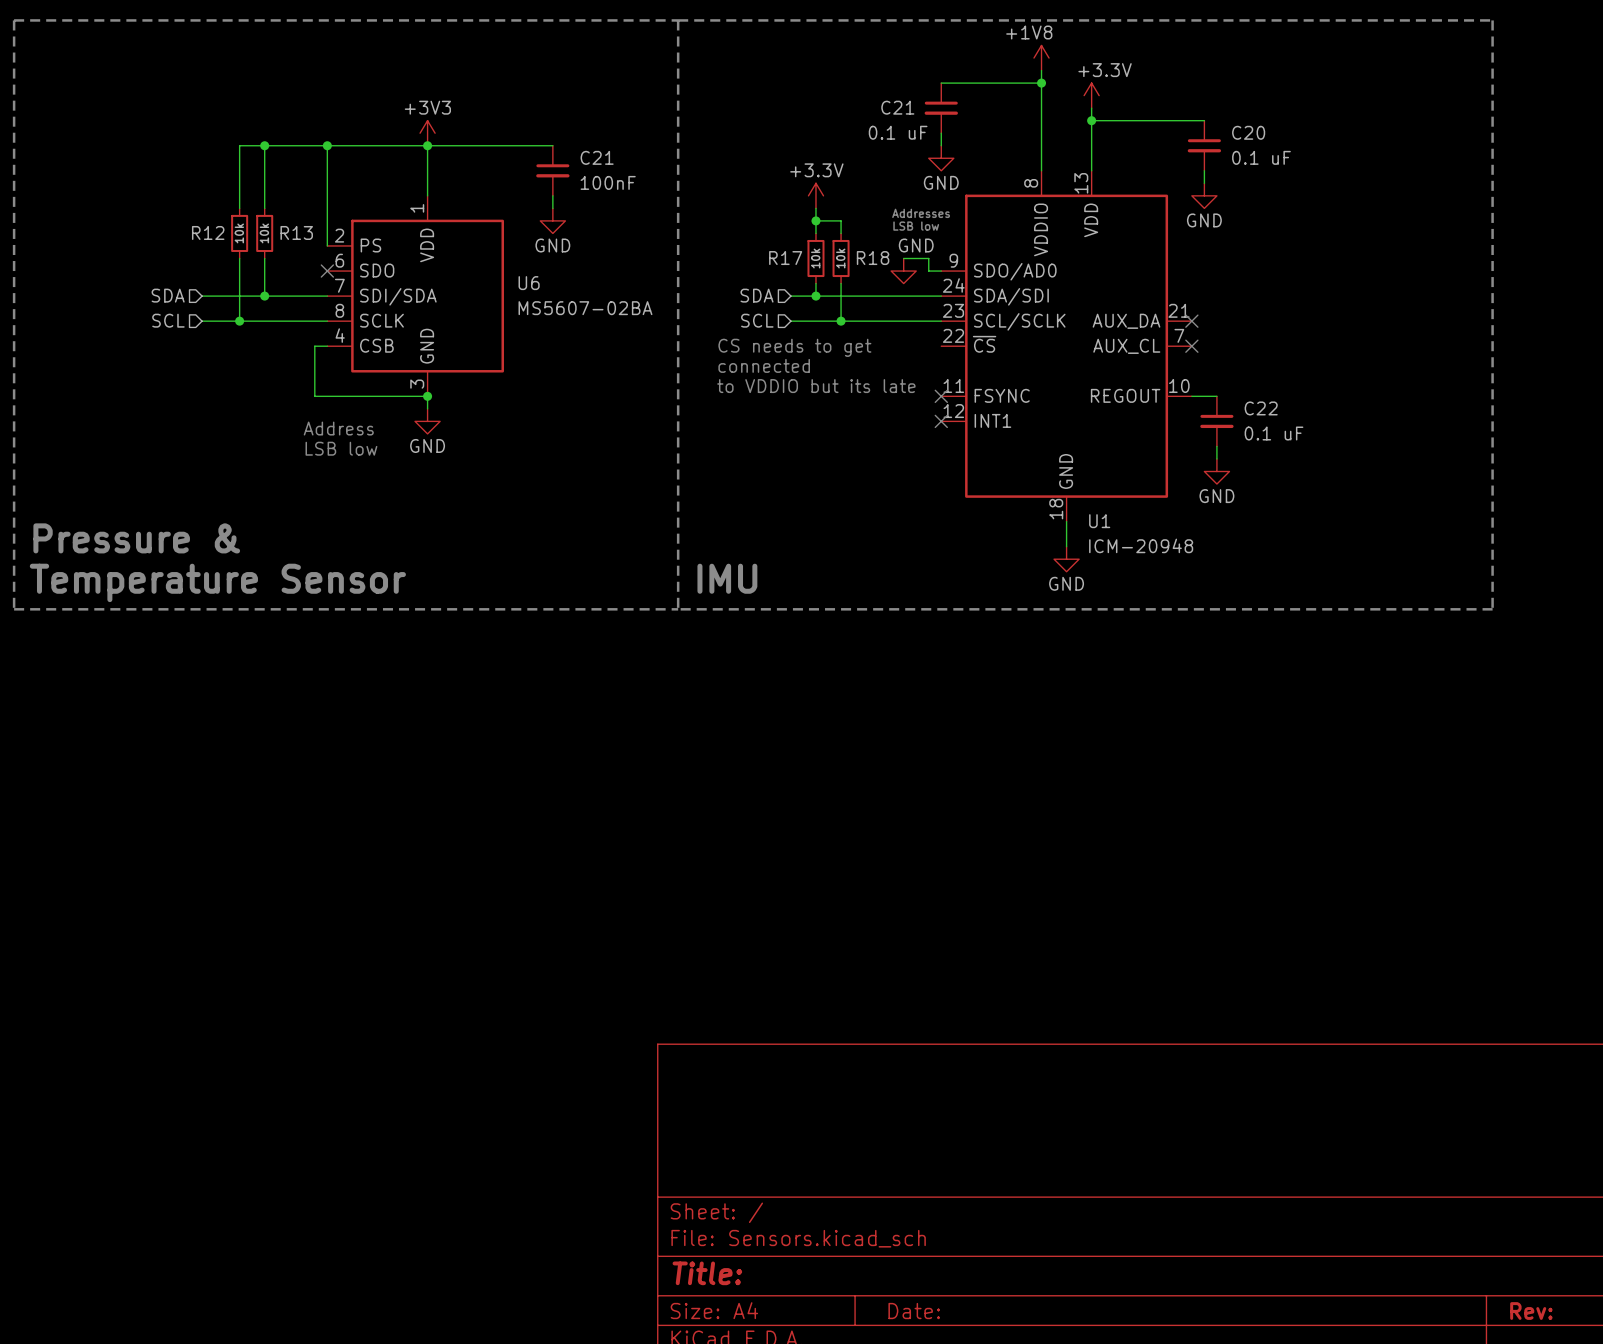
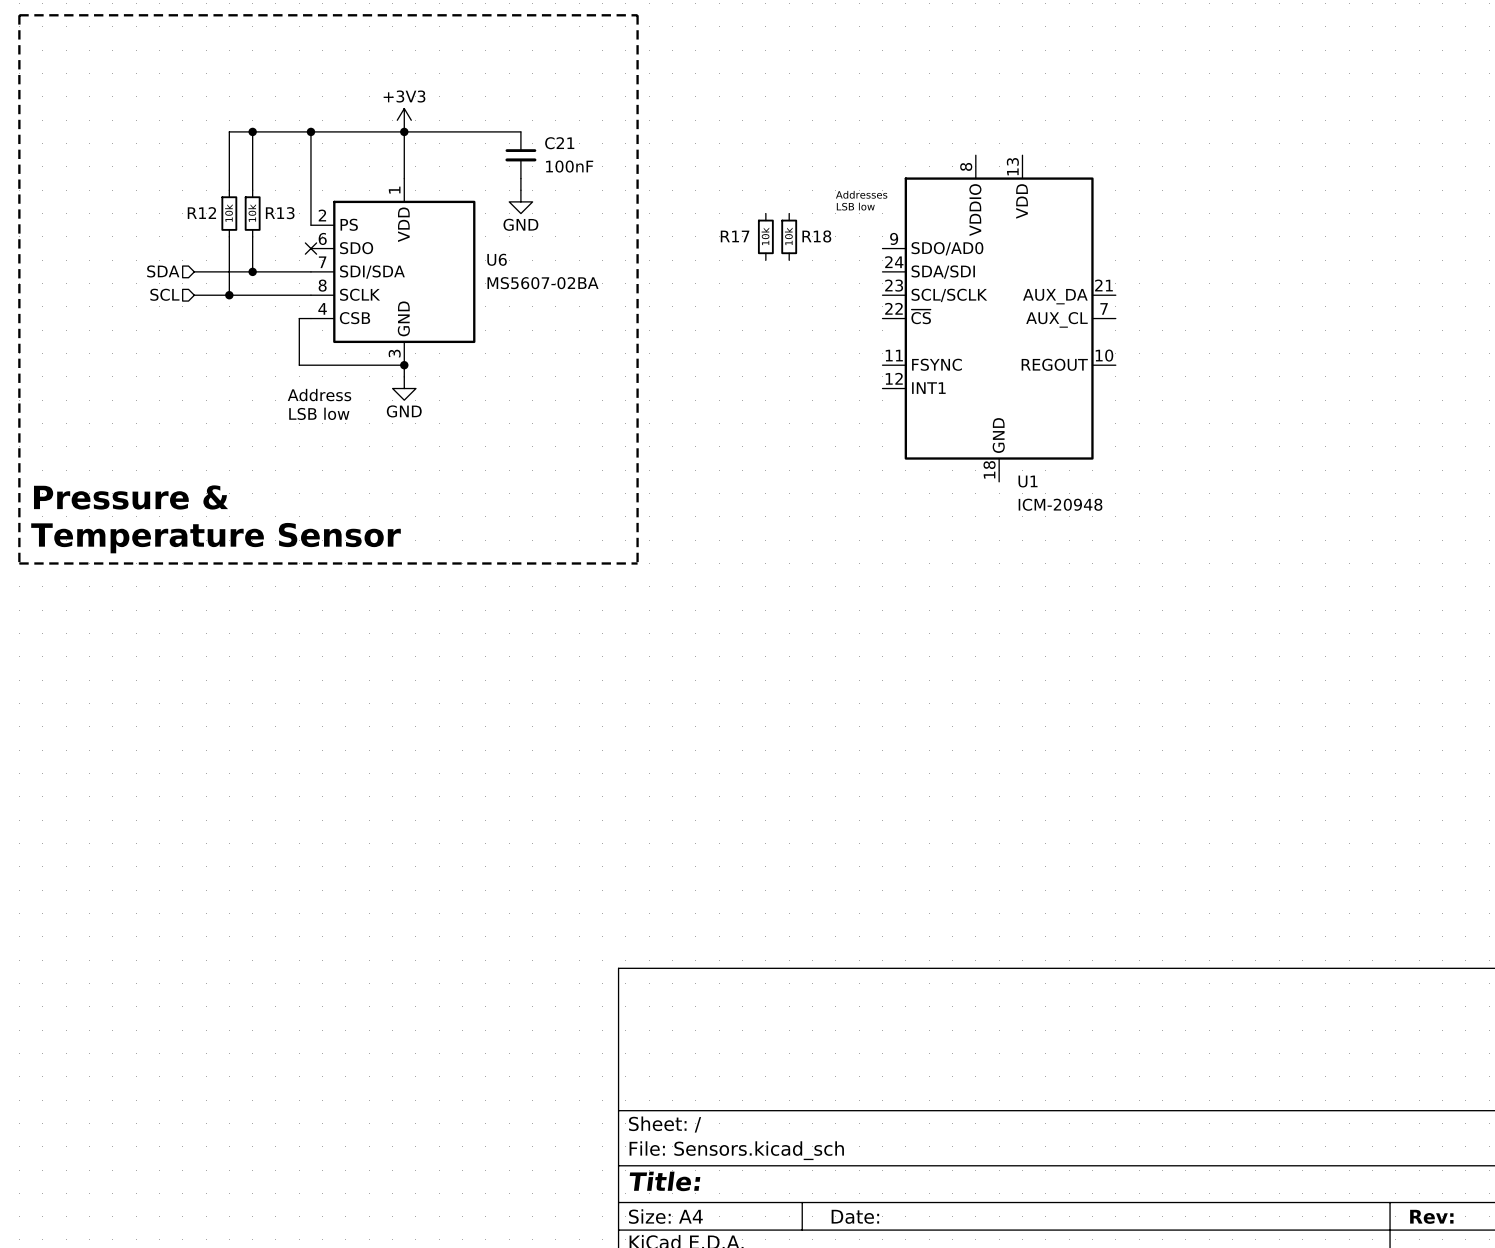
line: (678, 20) (1492, 20) (1492, 609) (678, 609) -> none
power symbol: +1V8 (1041, 58) -> none
wire: (1041, 70) (1041, 170) -> none
wire: (941, 83) (1041, 83) -> none
junction: (1041, 83) -> none
power symbol: +3.3V (1091, 95) -> none
C21: 0.1 uF (941, 108) -> none
wire: (1091, 108) (1091, 170) -> none
wire: (1091, 120) (1204, 120) -> none
junction: (1091, 120) -> none
wire: (941, 133) (941, 145) -> none
C20: 0.1 uF (1204, 145) -> none
power symbol: GND (941, 158) -> none
wire: (1204, 170) (1204, 183) -> none
power symbol: +3.3V (815, 195) -> none
power symbol: GND (1204, 195) -> none
wire: (815, 208) (815, 233) -> none
wire: (815, 220) (841, 220) (841, 233) -> none
junction: (815, 220) -> none
wire: (903, 258) (928, 258) (928, 271) (941, 271) -> none
power symbol: GND (903, 271) -> none
wire: (815, 283) (815, 296) -> none
wire: (841, 283) (841, 321) -> none
hierarchical label: SDA (757, 295) -> none
wire: (790, 296) (941, 296) -> none
junction: (815, 296) -> none
hierarchical label: SCL (757, 320) -> none
wire: (790, 321) (941, 321) -> none
junction: (841, 321) -> none
no-connect mark: (1191, 321) -> none
no-connect mark: (1191, 346) -> none
text: CS needs to get (794, 347) -> none
text: connected (764, 365) -> none
text: to VDDIO but its late (816, 386) -> none
no-connect mark: (941, 396) -> none
wire: (1191, 396) (1216, 396) -> none
no-connect mark: (941, 421) -> none
C22: 0.1 uF (1216, 421) -> none
wire: (1216, 446) (1216, 458) -> none
power symbol: GND (1216, 471) -> none
wire: (1066, 521) (1066, 546) -> none
power symbol: GND (1066, 559) -> none
text: IMU (727, 578) -> none

